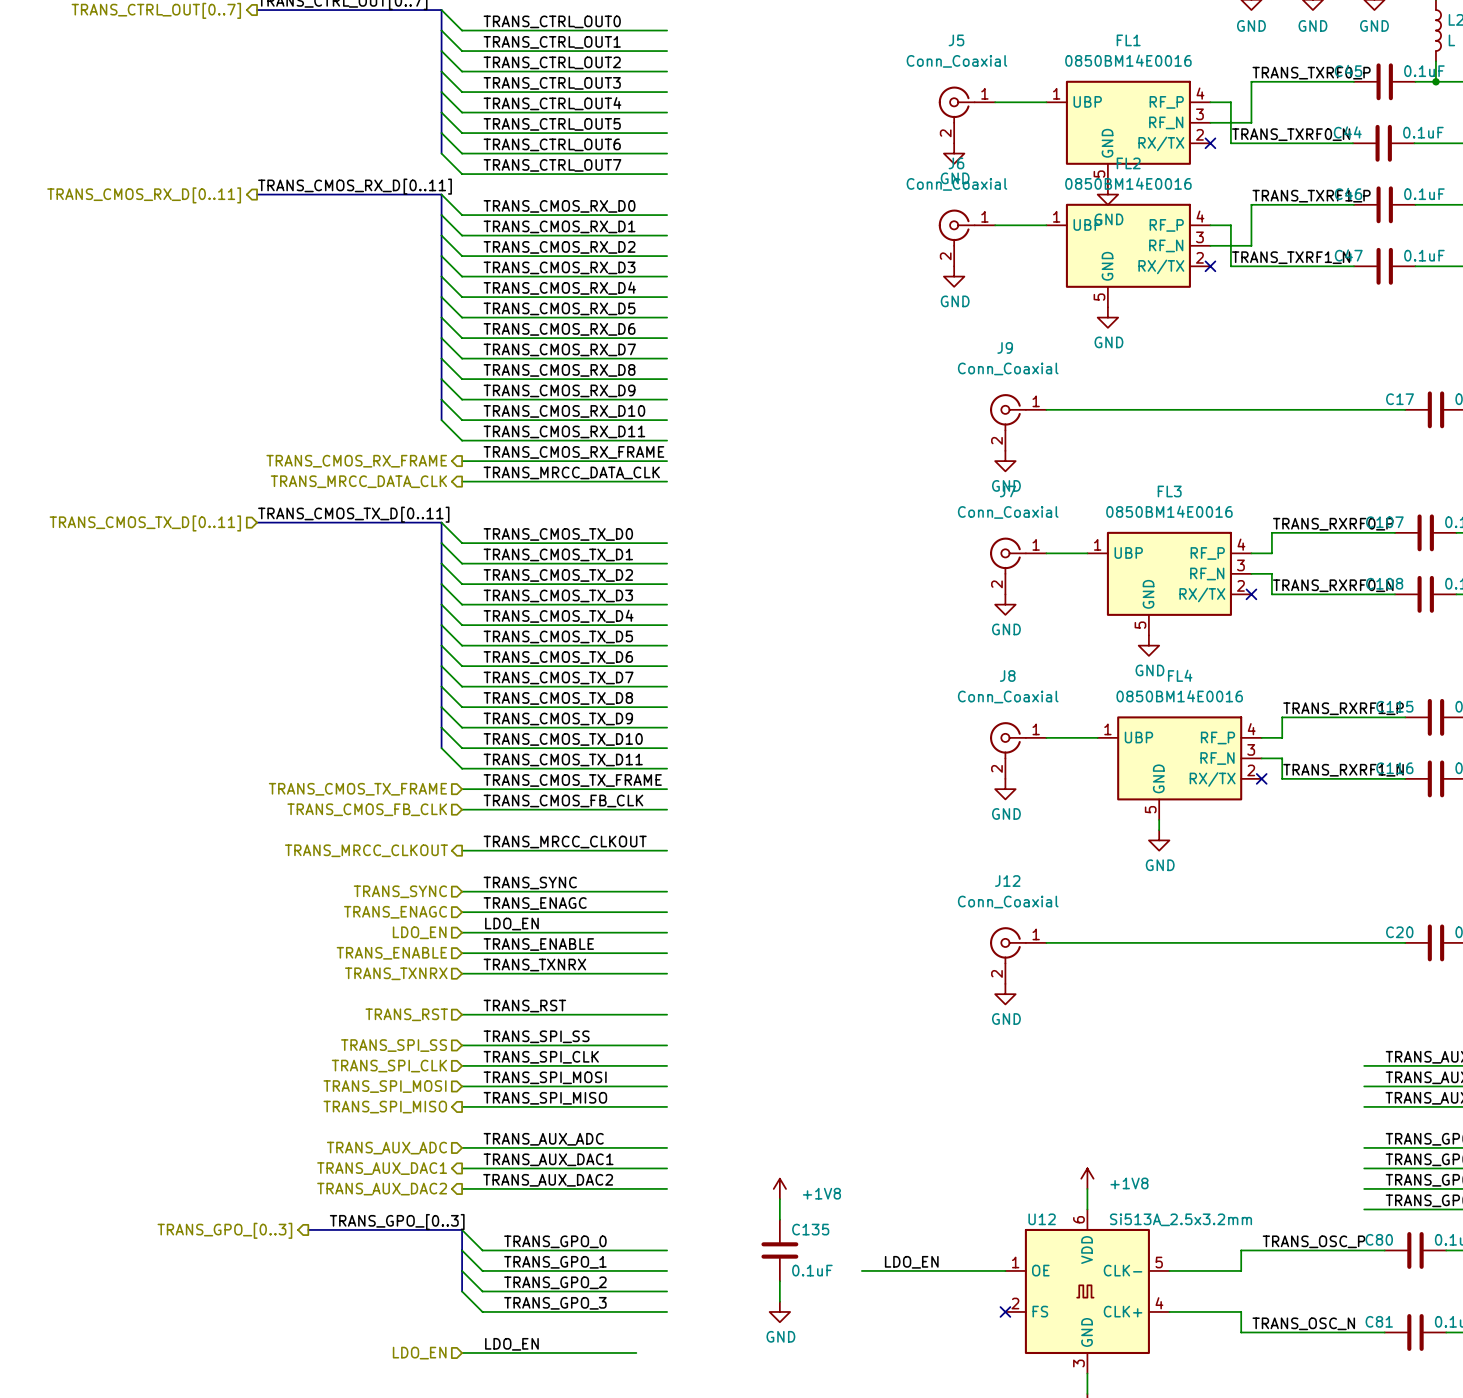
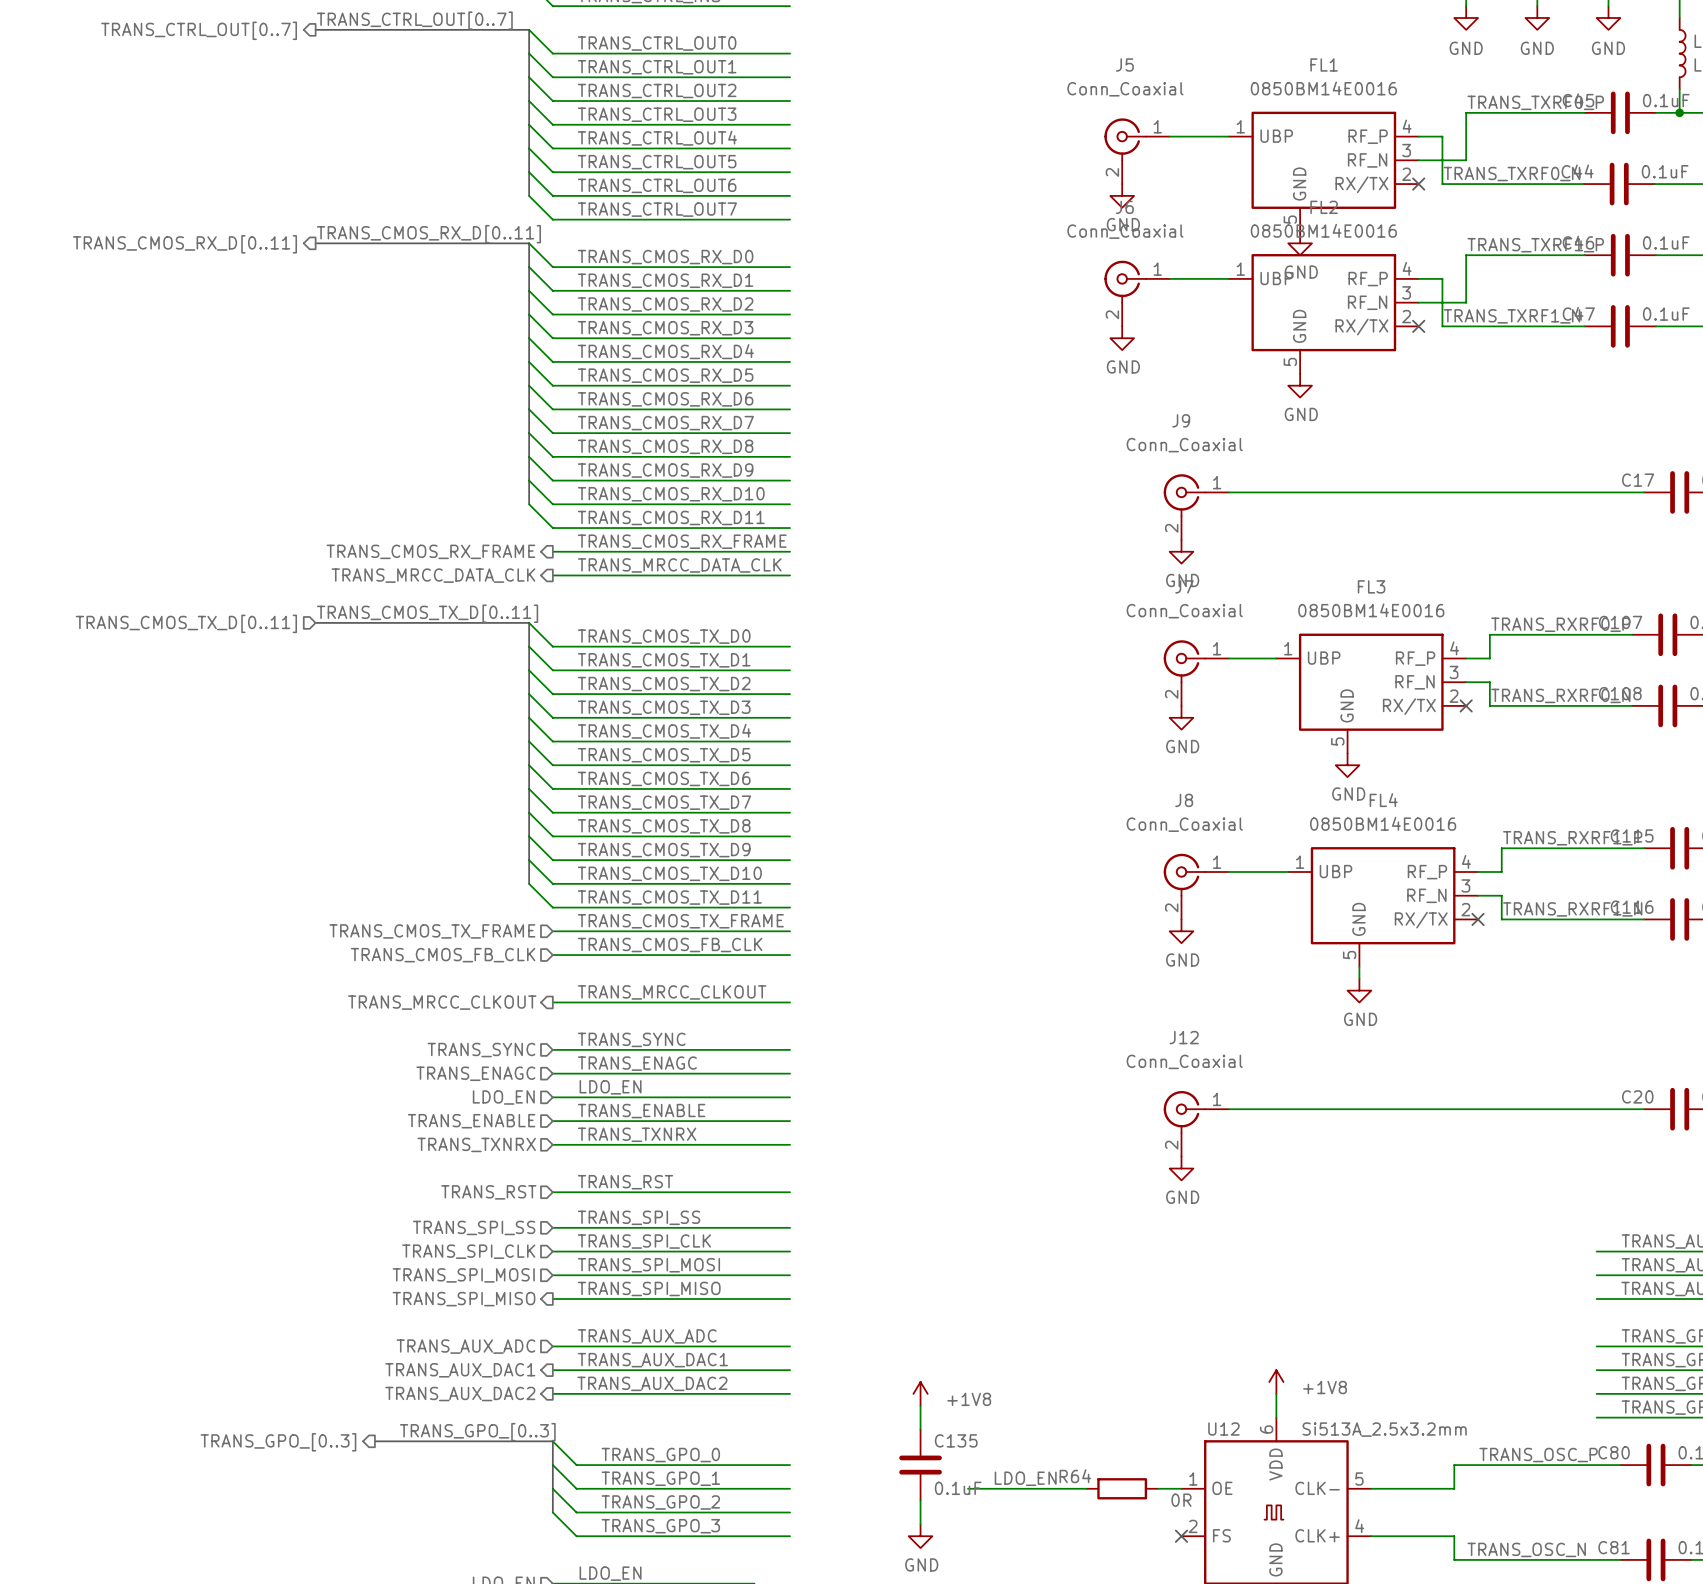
label position: LDO_EN (911, 1262) -> LDO_EN (1025, 1478)
wire: none -> (967, 1488) (1015, 1488)
wire: (923, 1270) (984, 1270) -> none
R64: none -> 0R (1122, 1488)

